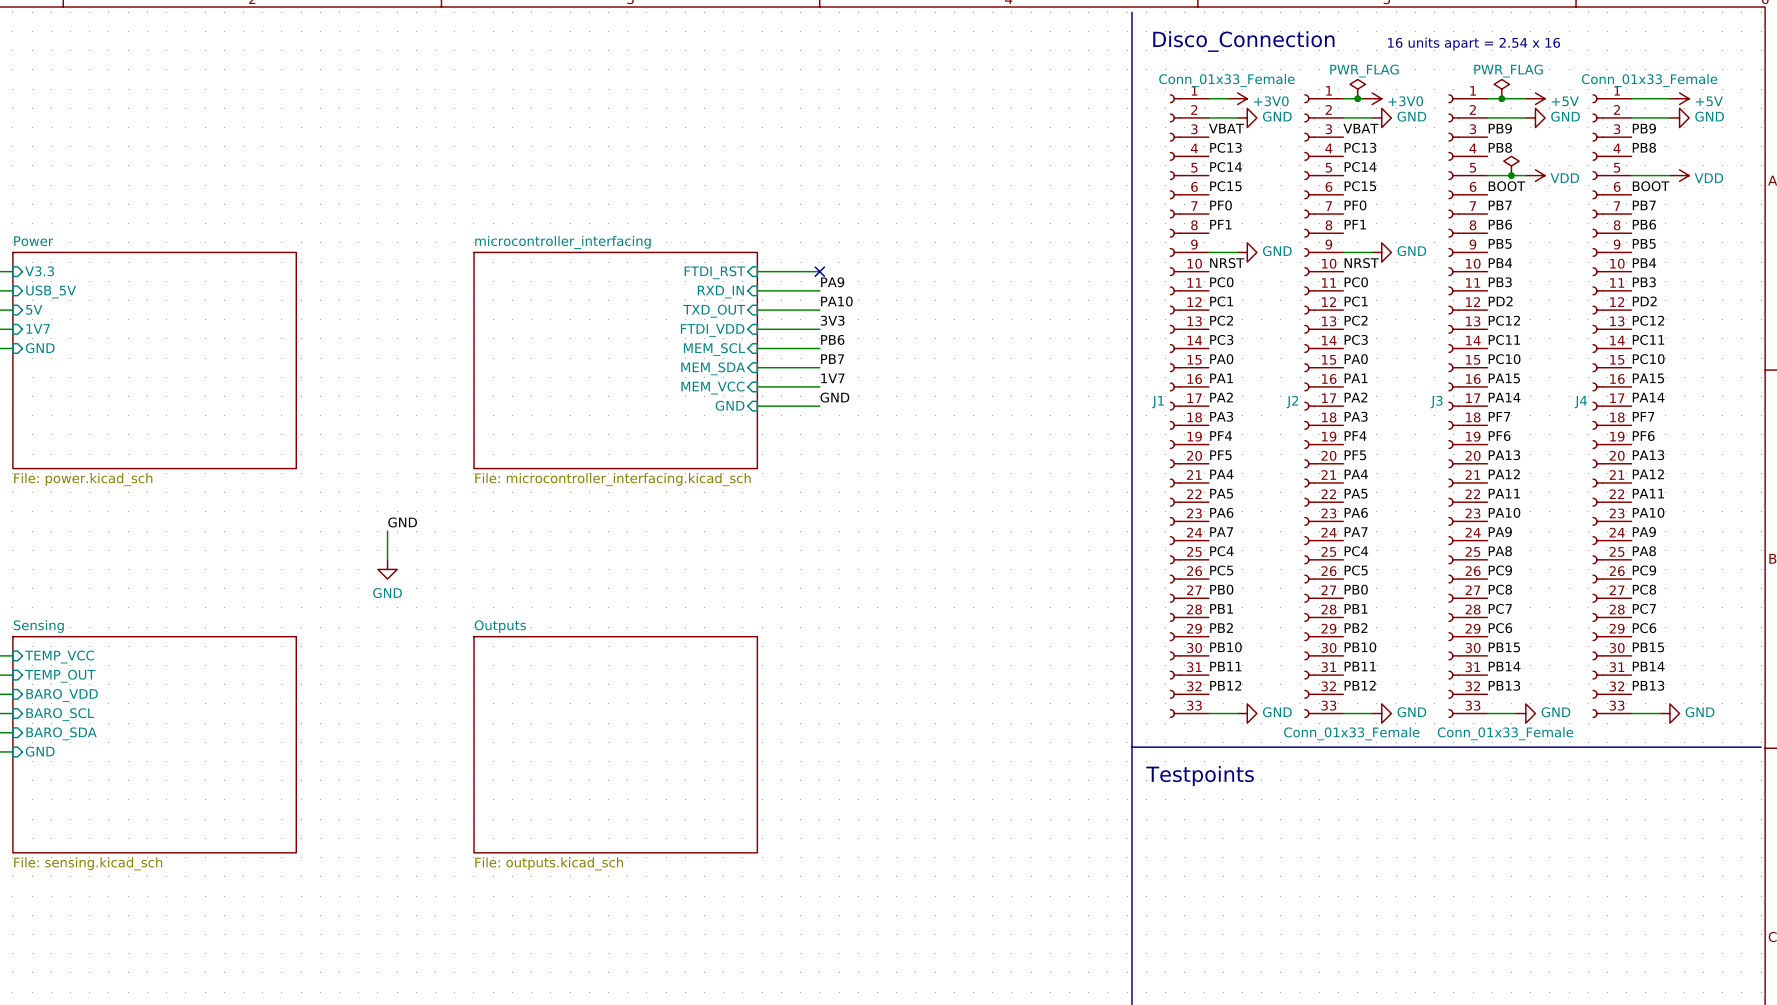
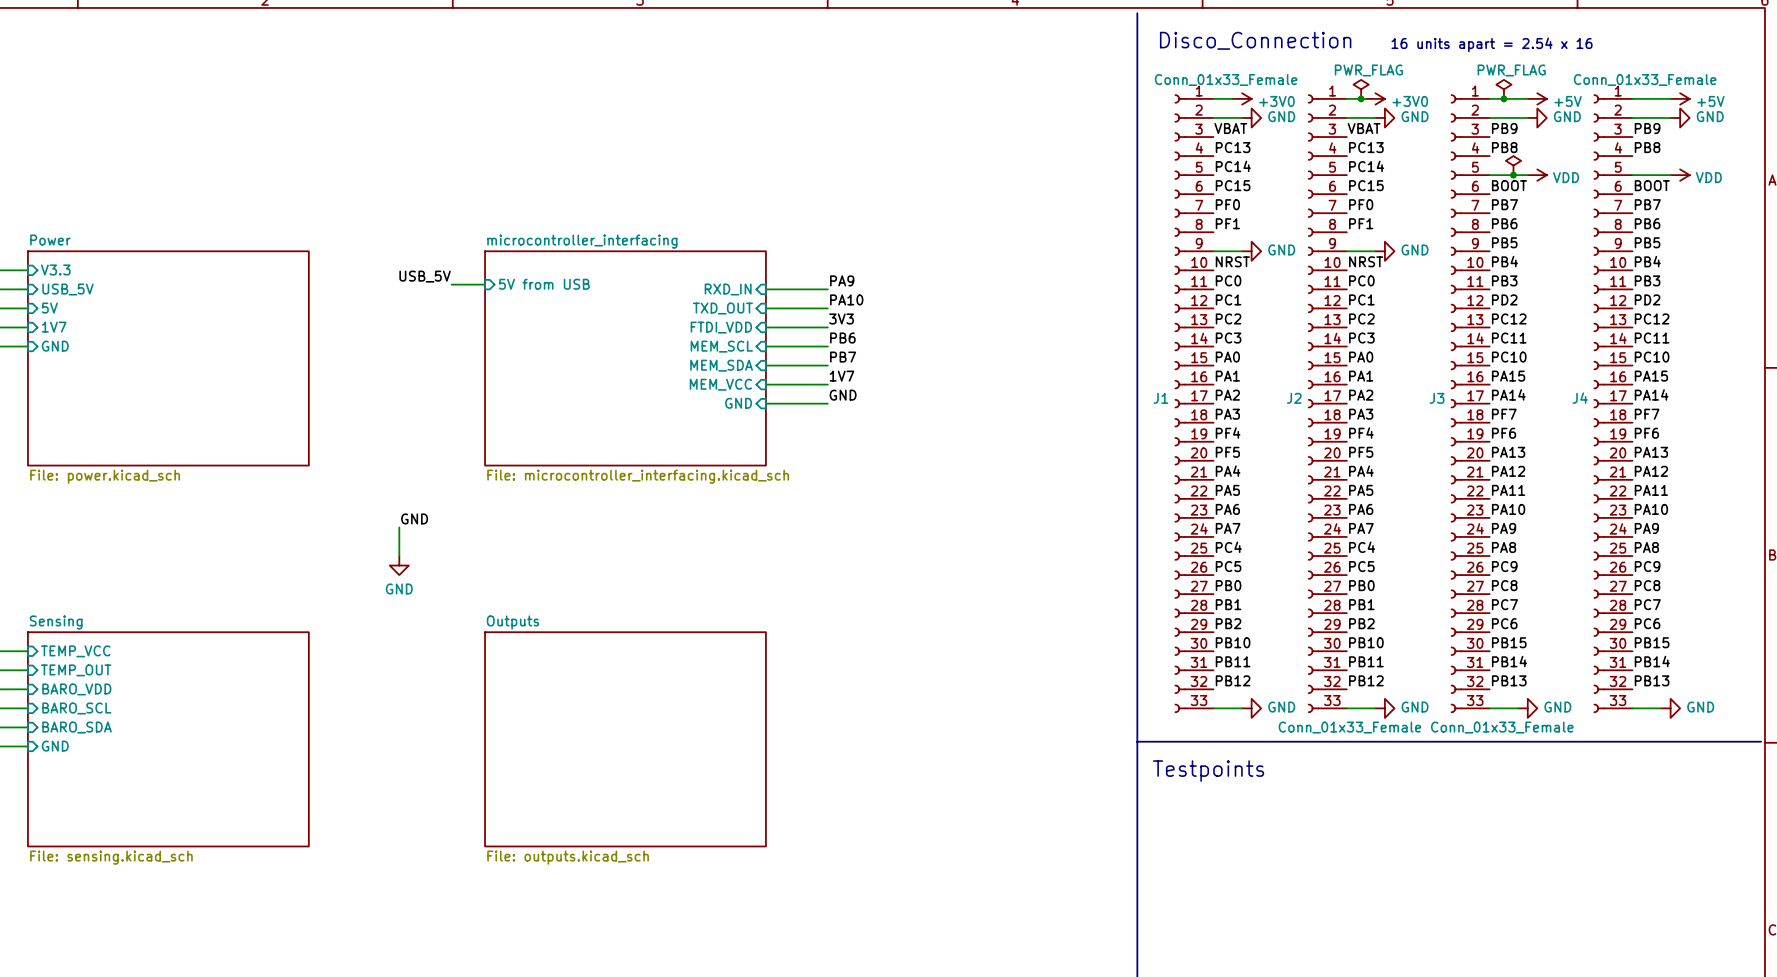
wire: (757, 271) (819, 271) -> none
no-connect mark: (819, 271) -> none
sheet pin: FTDI_RST (714, 272) -> none
label: none -> USB_5V (425, 276)
sheet pin: none -> 5V from USB (544, 284)
wire: none -> (451, 284) (485, 284)

